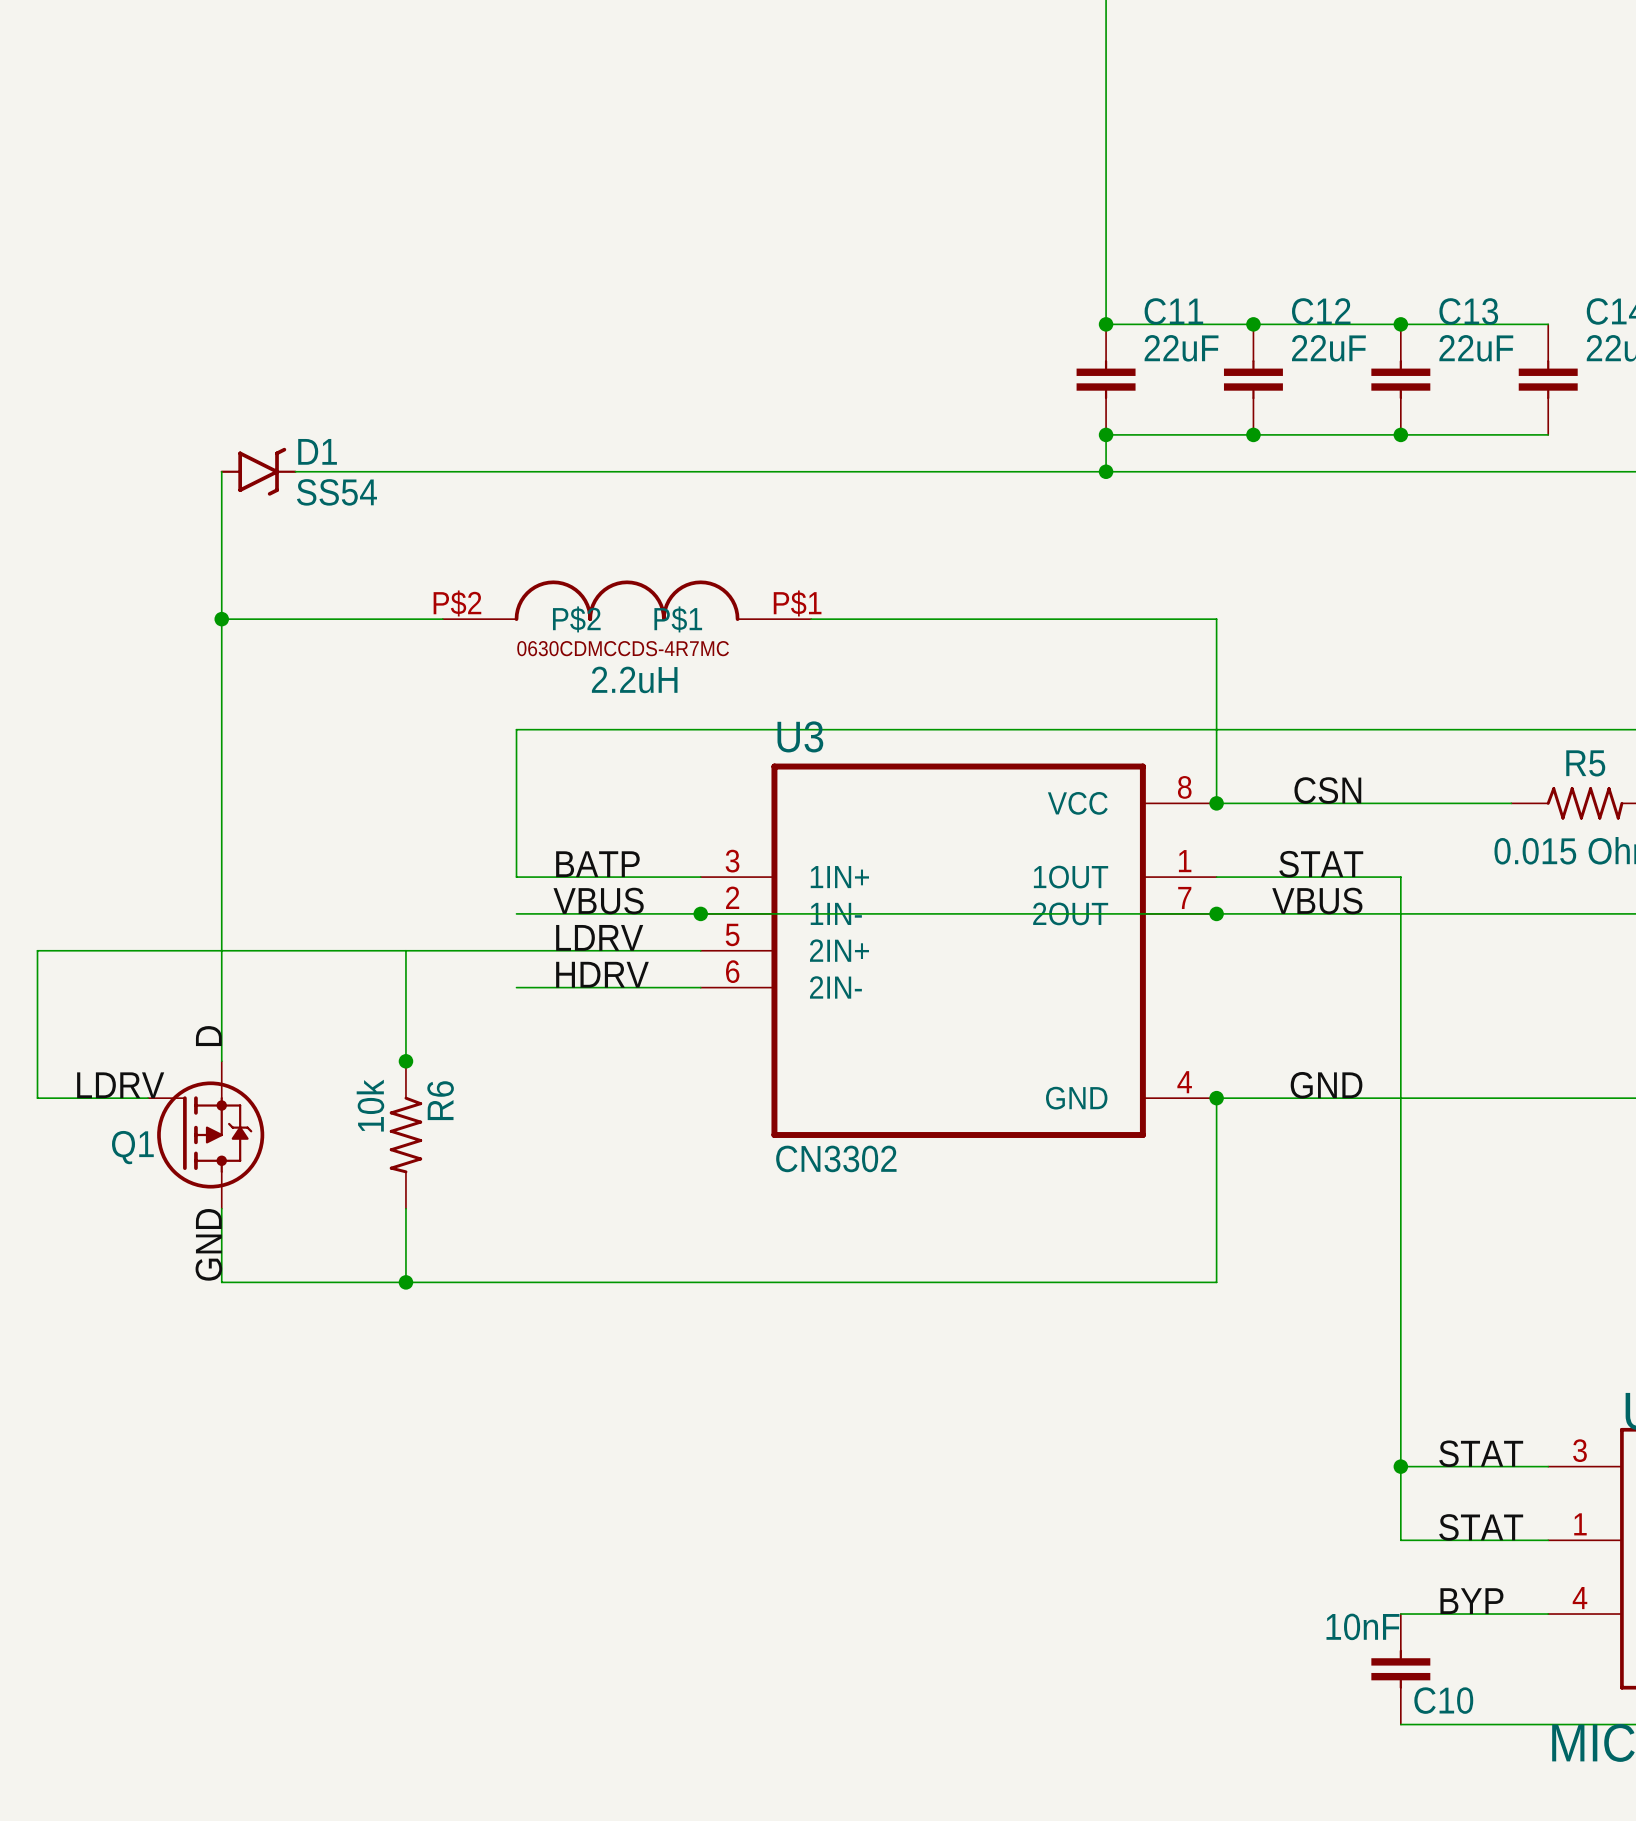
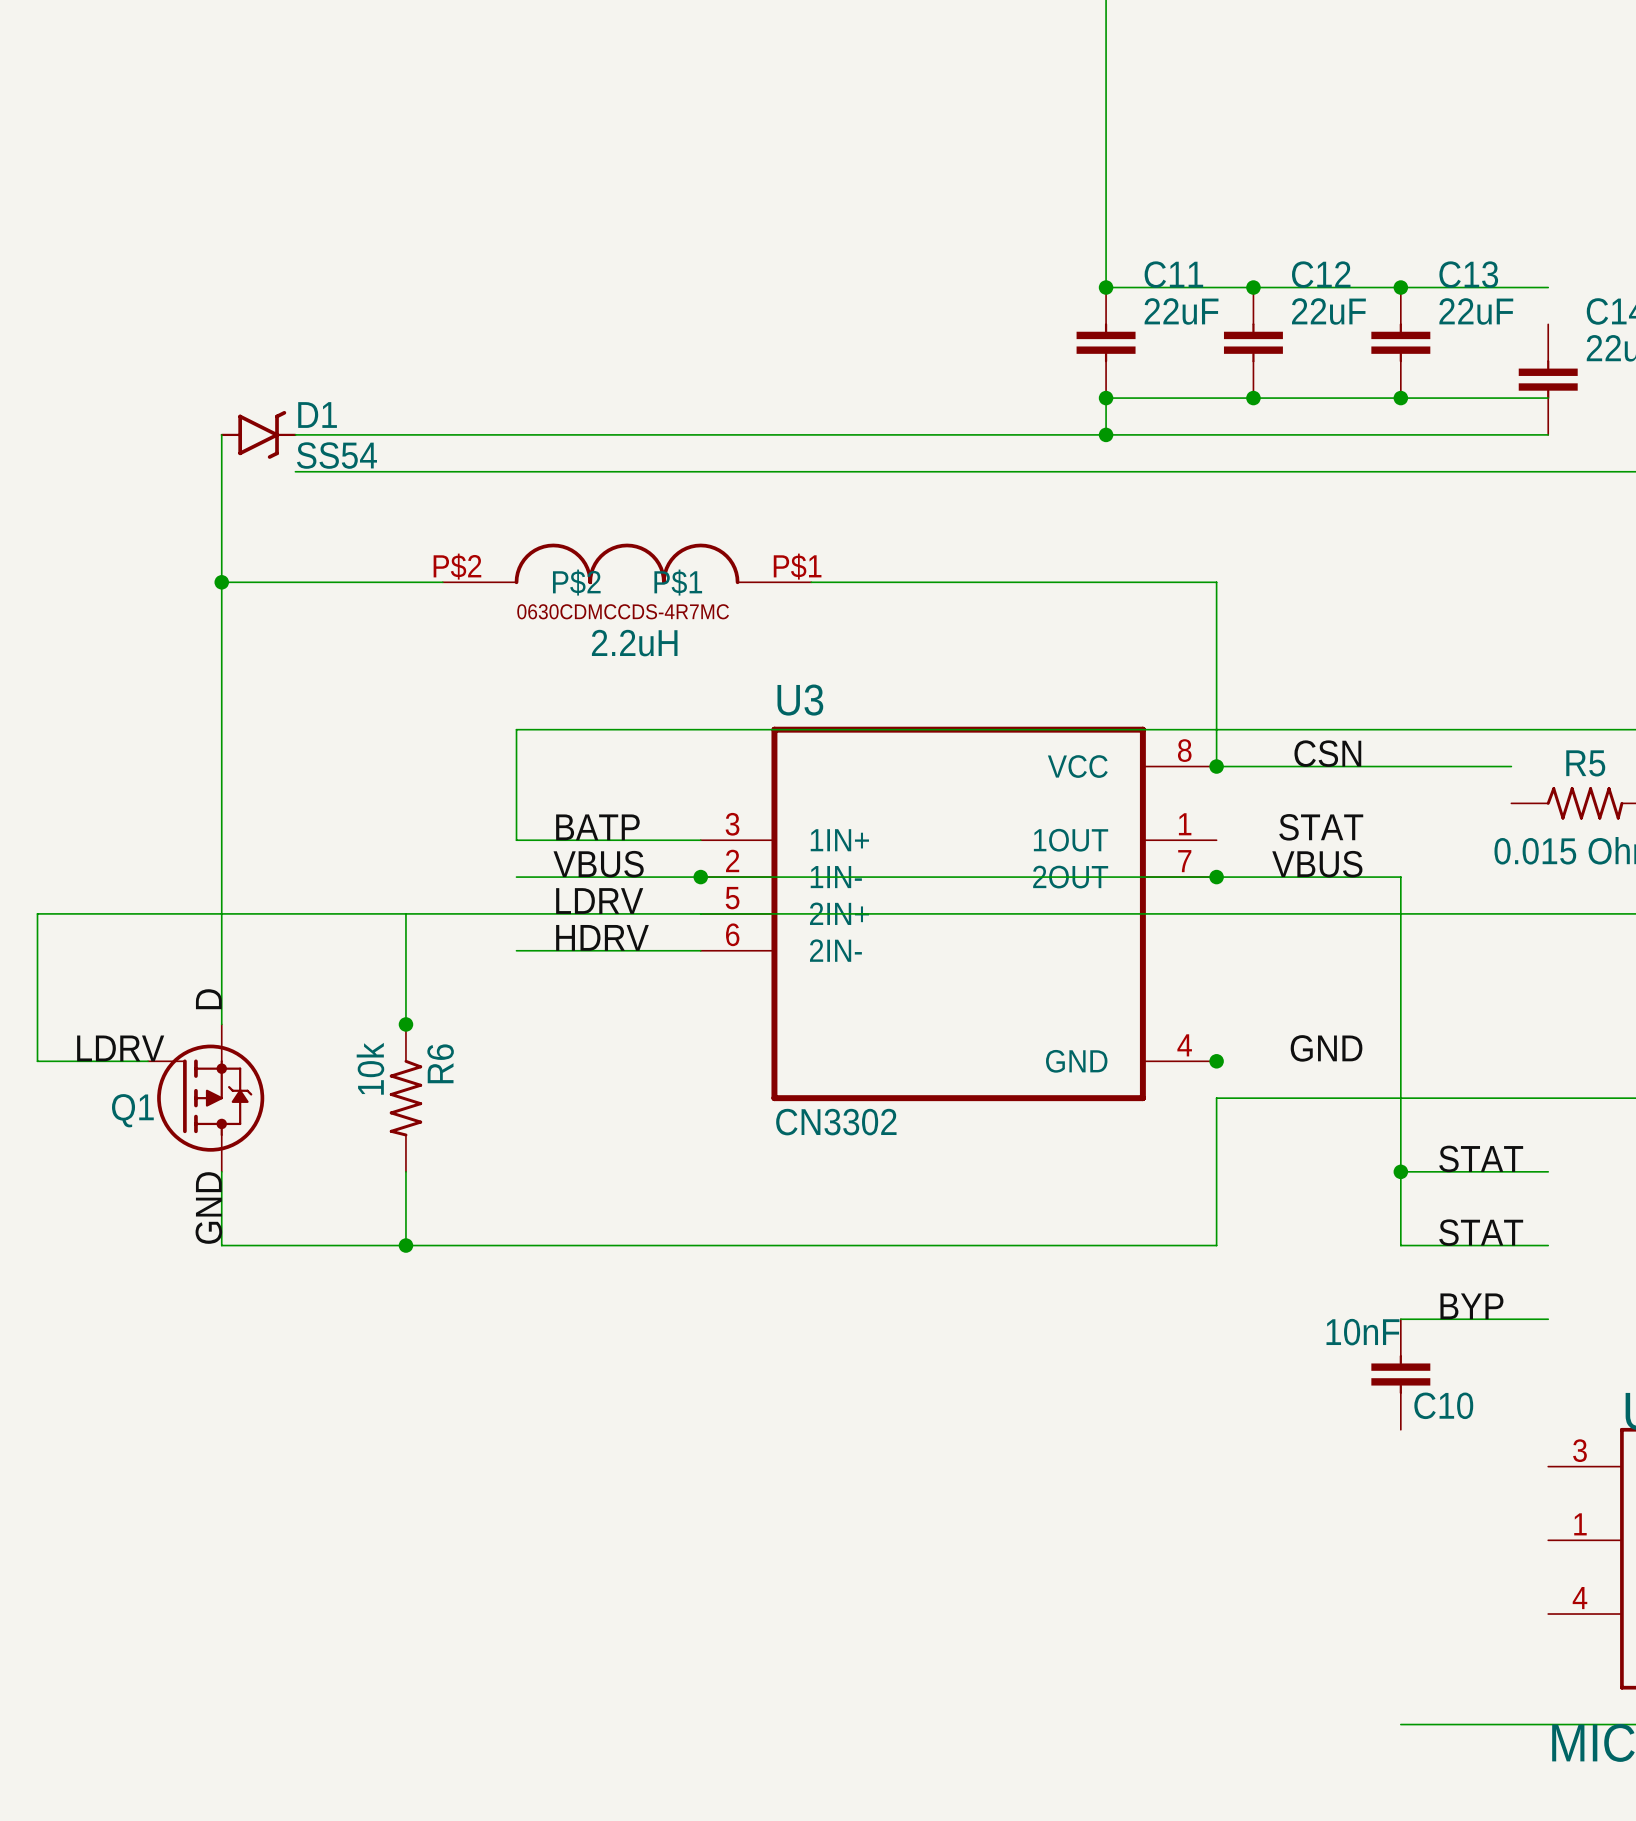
wire: (1106, 287) (1106, 324) (1548, 324) -> (1106, 287) (1548, 287)
junction: none -> (1106, 287)
junction: none -> (1253, 287)
junction: none -> (1400, 287)
junction: (1106, 324) -> none
junction: (1253, 324) -> none
junction: (1400, 324) -> none
C11 position: (1106, 379) -> (1106, 342)
C12 position: (1253, 379) -> (1253, 342)
C13 position: (1400, 379) -> (1400, 342)
junction: none -> (1106, 398)
junction: none -> (1253, 398)
junction: none -> (1400, 398)
wire: none -> (1548, 398) (1106, 398) (1106, 434) (295, 434)
wire: none -> (221, 434) (221, 471)
wire: (1106, 434) (1106, 471) -> none
junction: (1253, 434) -> none
junction: (1400, 434) -> none
D1 position: (258, 471) -> (258, 434)
junction: (1106, 471) -> none
part position: (627, 600) -> (627, 563)
wire: (221, 619) (442, 619) -> (221, 582) (442, 582)
junction position: (221, 619) -> (221, 582)
wire: (811, 619) (1216, 619) -> (811, 582) (1216, 582) (1216, 619)
text position: 2.2uH (634, 679) -> 2.2uH (634, 643)
wire: (1216, 766) (1216, 803) (1511, 803) -> (1216, 766) (1511, 766)
junction: none -> (1216, 766)
label position: CSN (1327, 790) -> CSN (1327, 753)
junction: (1216, 803) -> none
label: none -> BATP (597, 827)
label: none -> STAT (1321, 827)
wire: (516, 840) (516, 877) -> (516, 840) (700, 840)
label: BATP (597, 864) -> VBUS (598, 864)
label: STAT (1321, 864) -> VBUS (1317, 864)
wire: none -> (700, 877) (1216, 877)
junction: none -> (1216, 877)
label: VBUS (598, 901) -> LDRV (599, 901)
label: VBUS (1317, 901) -> none
junction position: (700, 913) -> (700, 877)
junction: (1216, 913) -> none
label: LDRV (599, 937) -> HDRV (602, 937)
wire: (37, 950) (516, 950) -> (37, 950) (37, 913) (516, 913)
U3 position: (958, 950) -> (958, 913)
label: HDRV (602, 974) -> none
wire: (516, 987) (700, 987) -> none
label position: D (208, 1036) -> D (208, 999)
wire: (37, 1061) (37, 1098) (148, 1098) -> (37, 1061) (148, 1061)
junction position: (405, 1061) -> (405, 1024)
label position: LDRV (120, 1085) -> LDRV (120, 1048)
label position: GND (1326, 1085) -> GND (1326, 1048)
junction position: (1216, 1098) -> (1216, 1061)
Q1 position: (206, 1135) -> (206, 1098)
R6 position: (405, 1135) -> (405, 1098)
text position: CN3302 (836, 1158) -> CN3302 (836, 1122)
label: none -> STAT (1481, 1158)
wire: none -> (1400, 1171) (1548, 1171)
junction: none -> (1400, 1171)
label: none -> STAT (1481, 1232)
label position: GND (208, 1244) -> GND (208, 1208)
wire: (221, 1245) (221, 1282) (1216, 1282) (1216, 1245) -> (221, 1245) (1216, 1245)
wire: (405, 1245) (405, 1282) -> (405, 913) (405, 950)
wire: (1400, 1245) (1400, 1540) (1548, 1540) -> (1400, 1245) (1548, 1245)
junction position: (405, 1282) -> (405, 1245)
label: STAT (1481, 1453) -> none
wire: (1400, 1466) (1548, 1466) -> (1400, 1319) (1548, 1319)
junction: (1400, 1466) -> none
label: STAT (1481, 1527) -> none
label position: BYP (1471, 1601) -> BYP (1471, 1306)
wire: (1400, 1614) (1548, 1614) -> none
C10 position: (1400, 1669) -> (1400, 1374)

